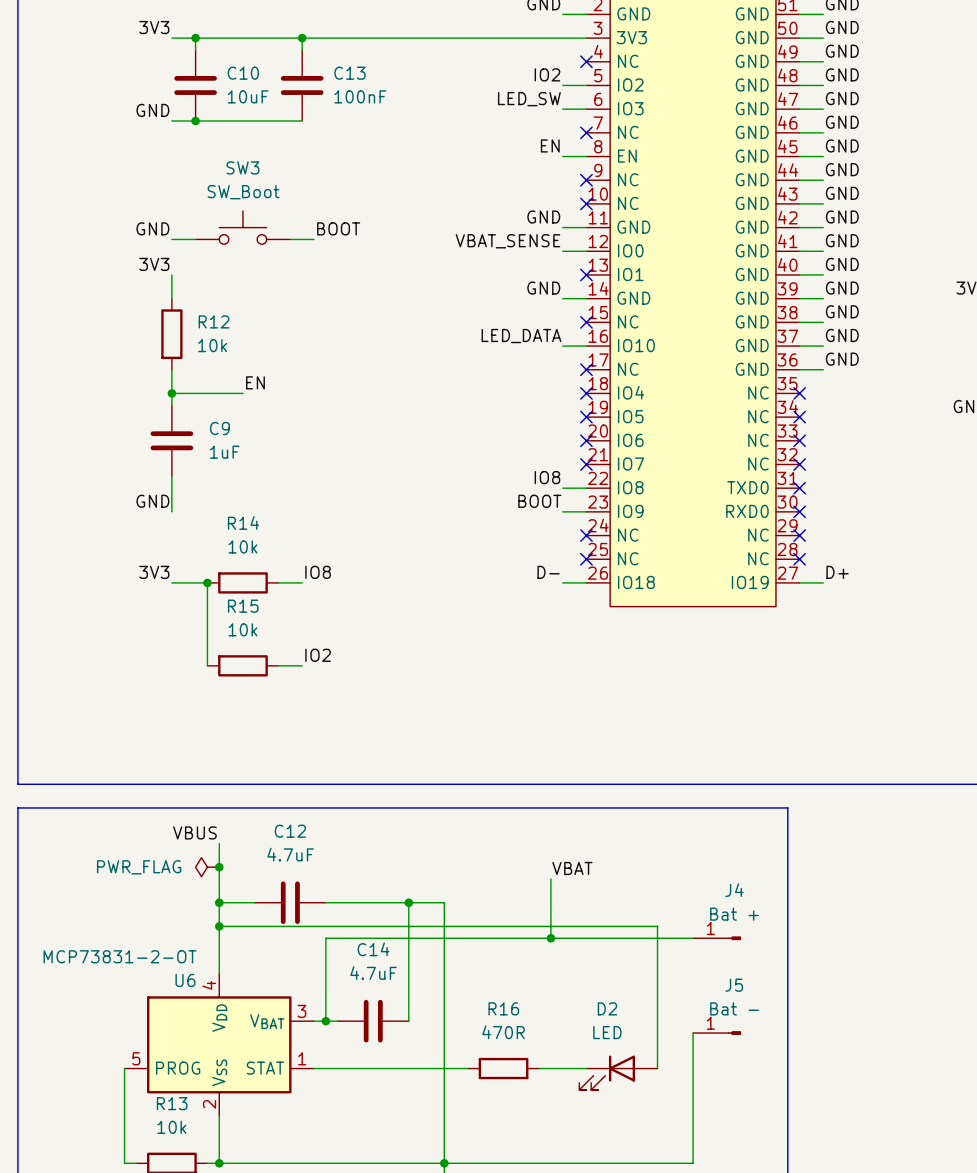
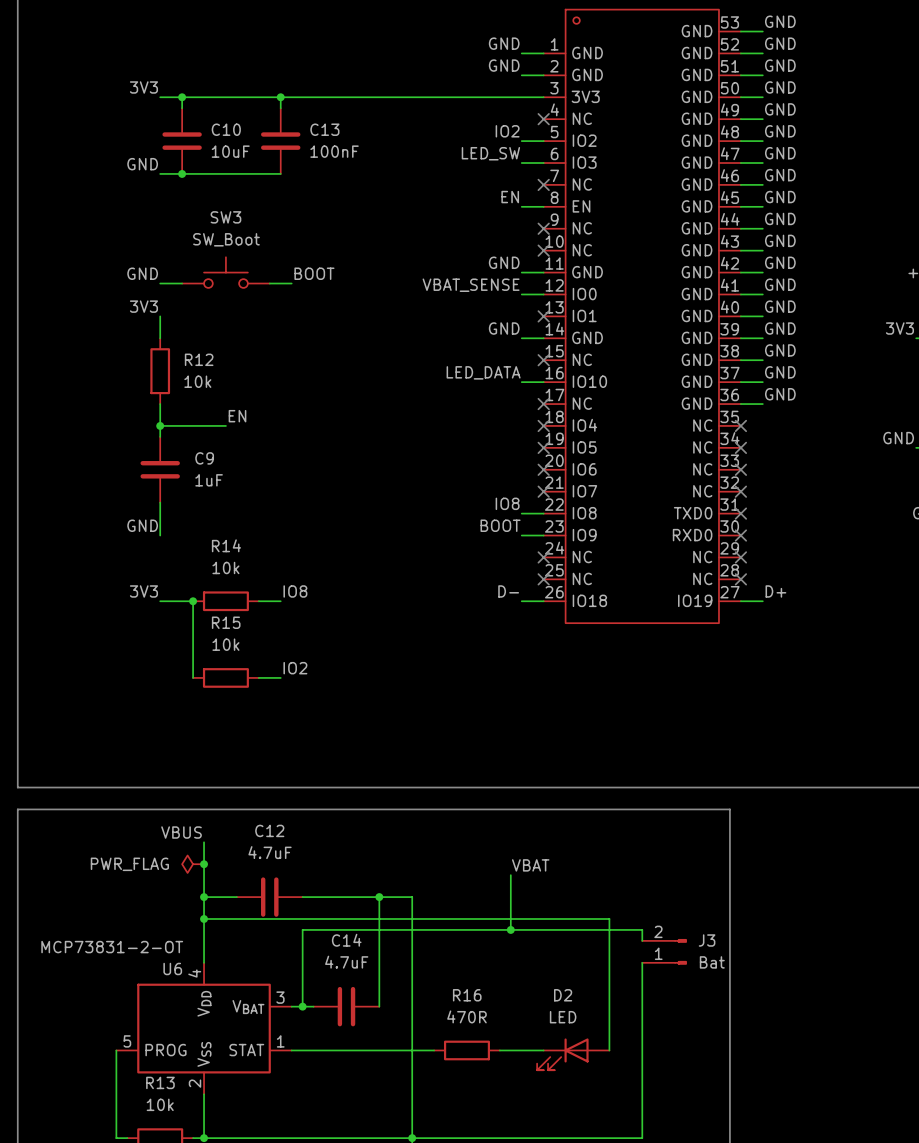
wire: none -> (642, 929) (642, 940)
J4: Bat + (717, 938) -> none
J3: none -> Bat (664, 951)
wire: none -> (642, 962) (642, 1017)
J5: Bat - (717, 1033) -> none

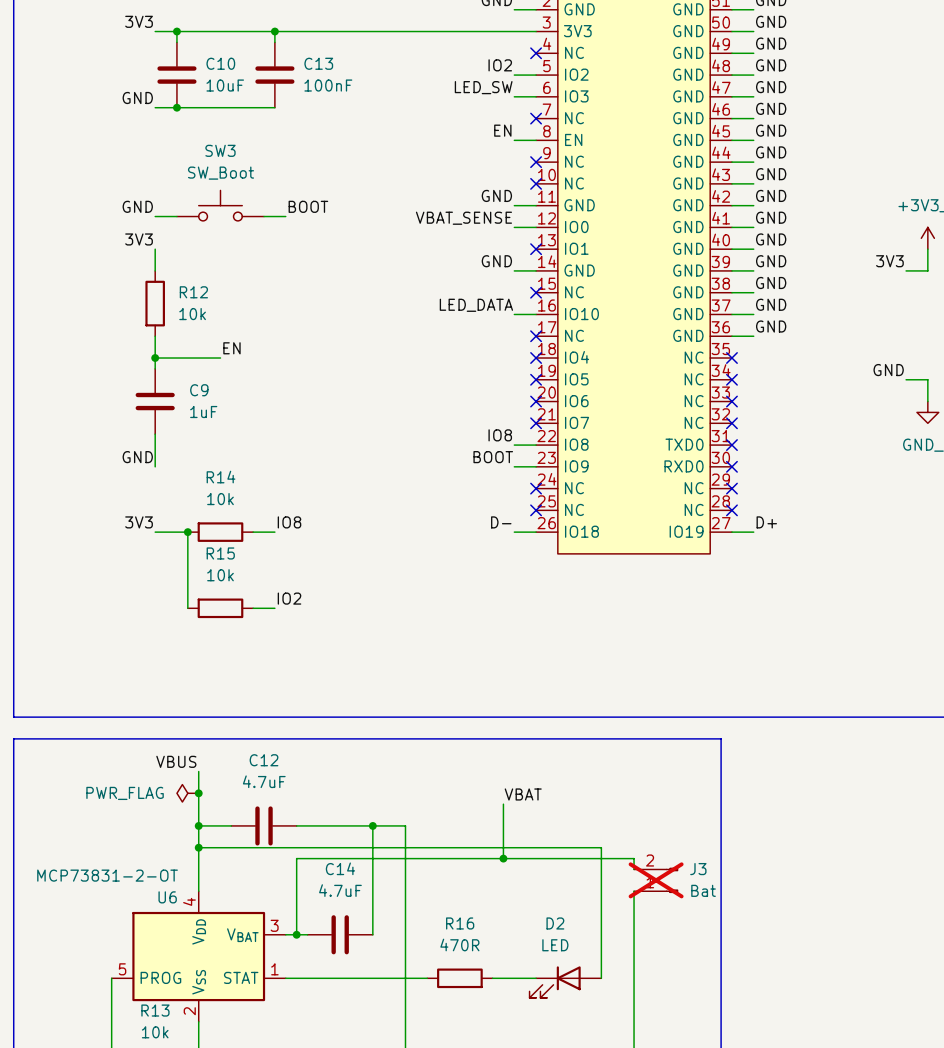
J3 do-not-place cross: none -> (656, 880)

